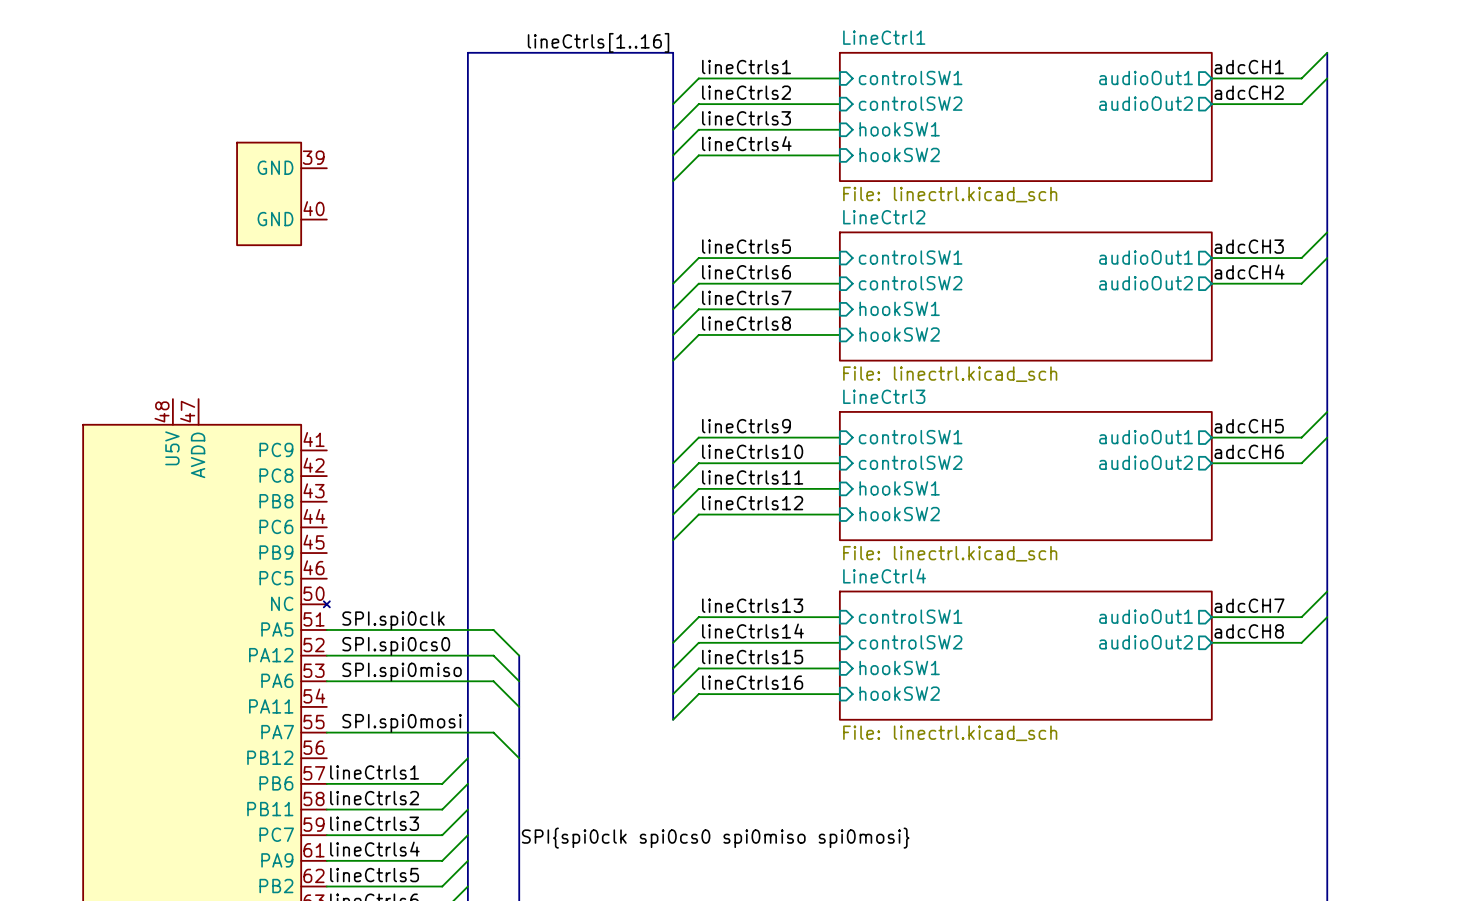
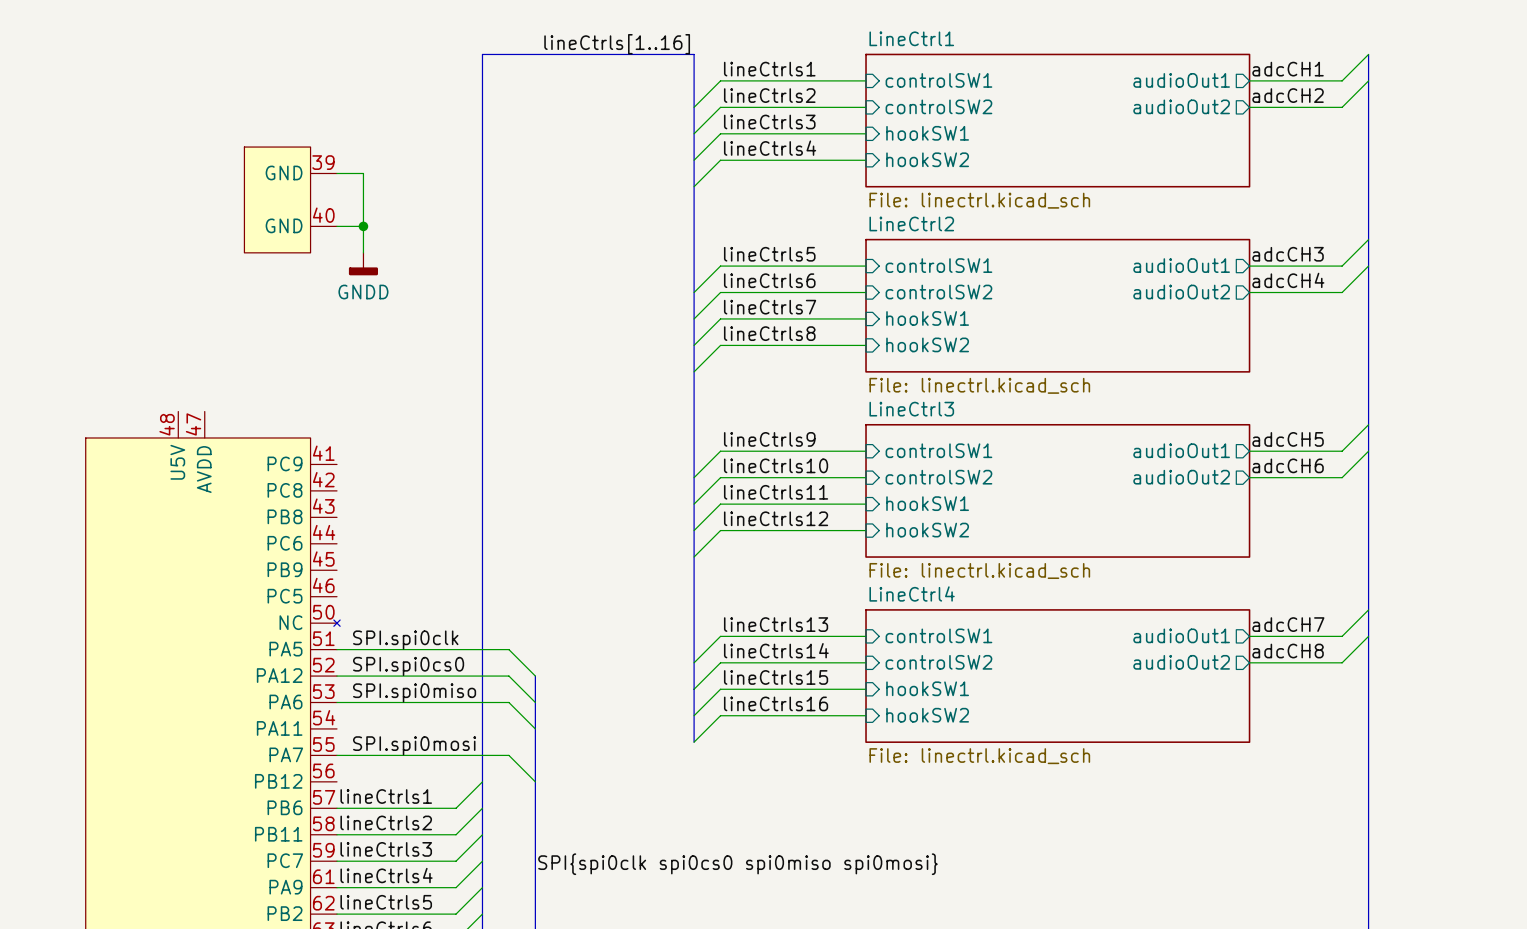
wire: none -> (337, 173) (363, 173) (363, 252)
wire: none -> (337, 226) (363, 226)
junction: none -> (363, 226)
power symbol: none -> GNDD (363, 264)

